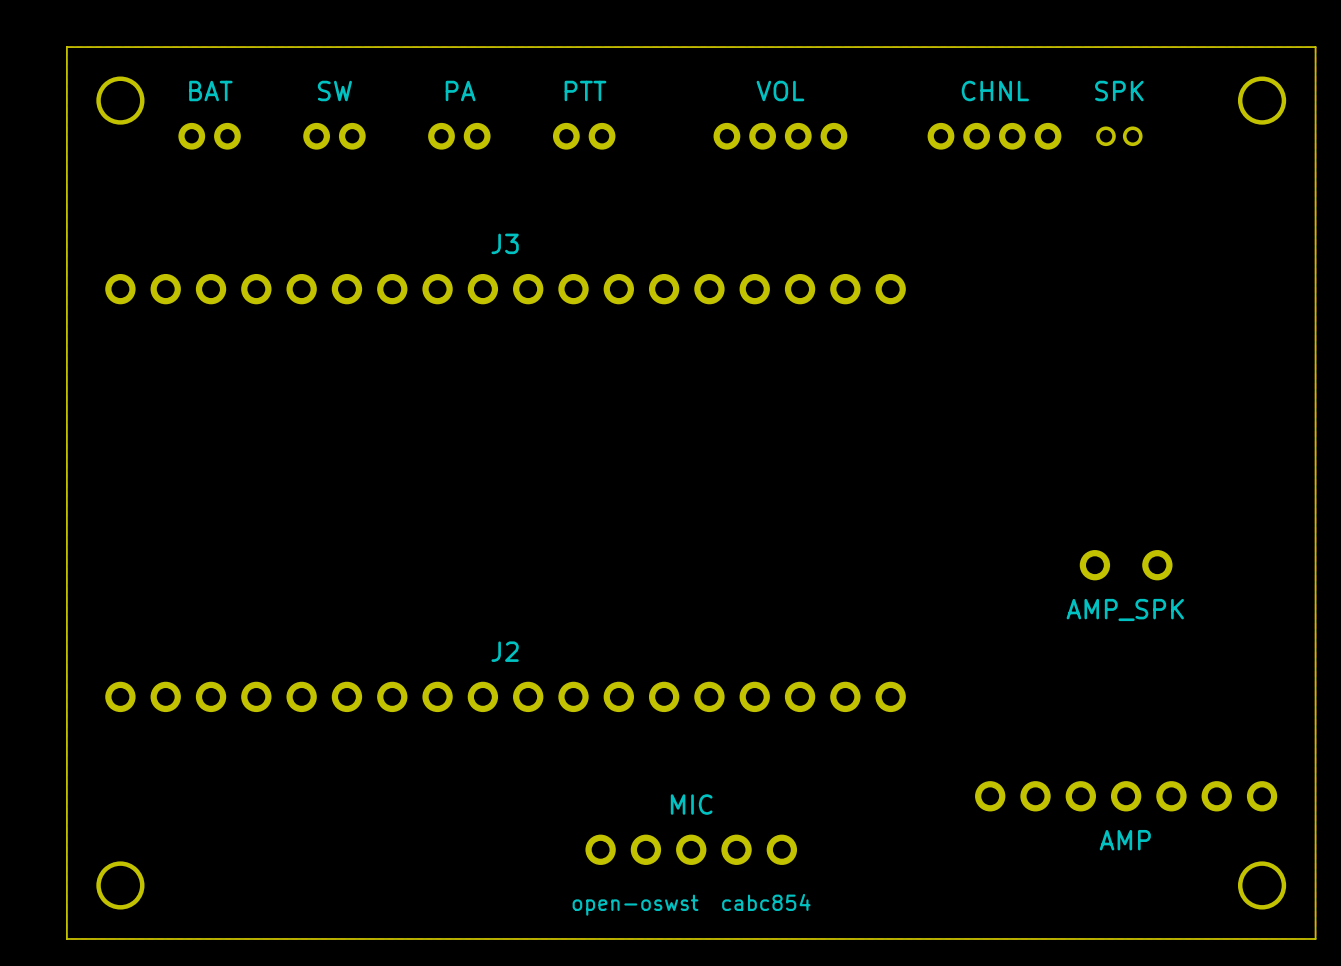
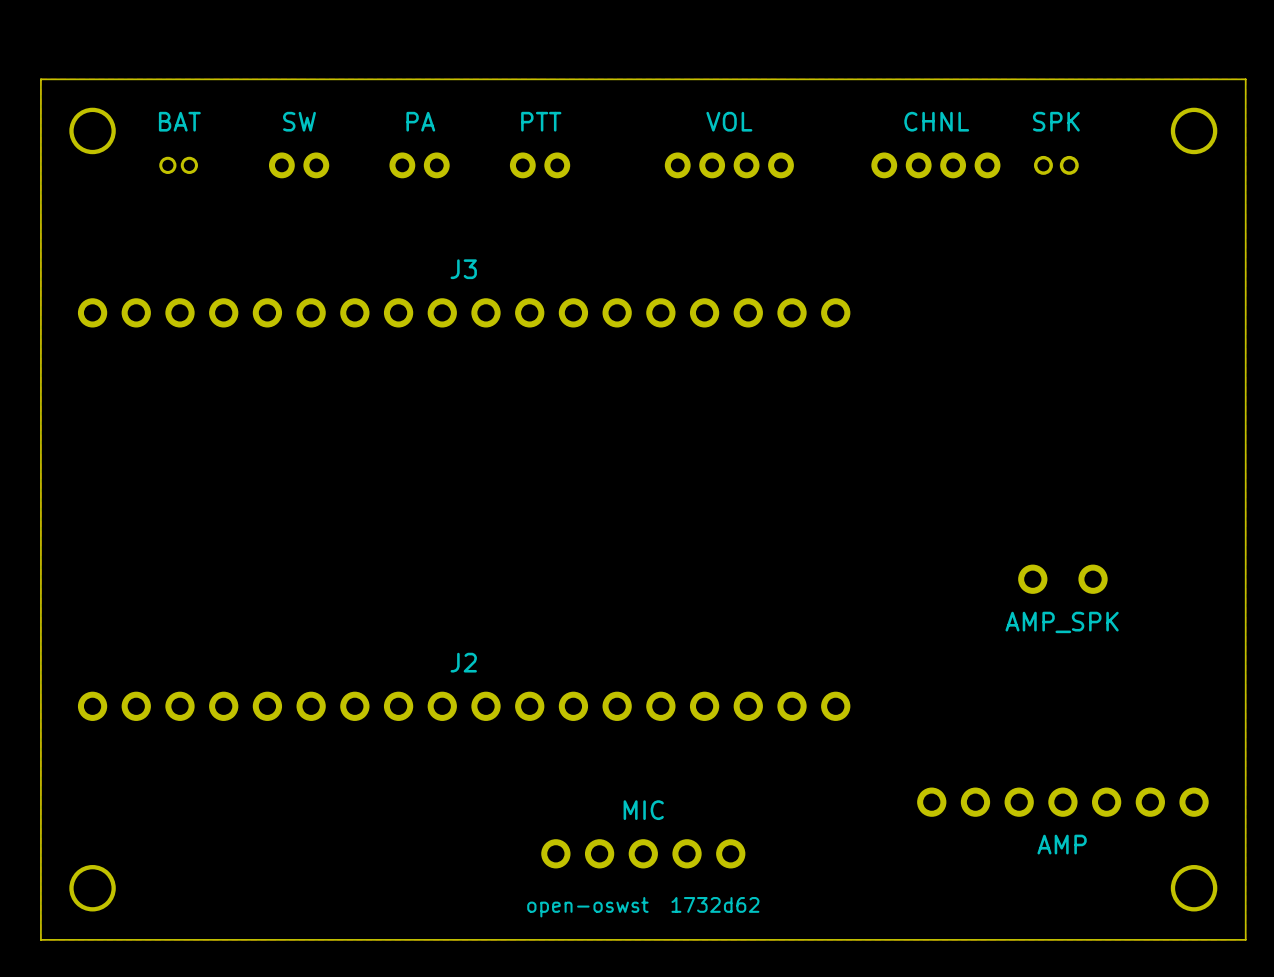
BAT footprint: [178, 122, 241, 150] -> [159, 156, 198, 174]
text: open-oswst cabc854 (691, 904) -> open-oswst 1732d62 (643, 907)

